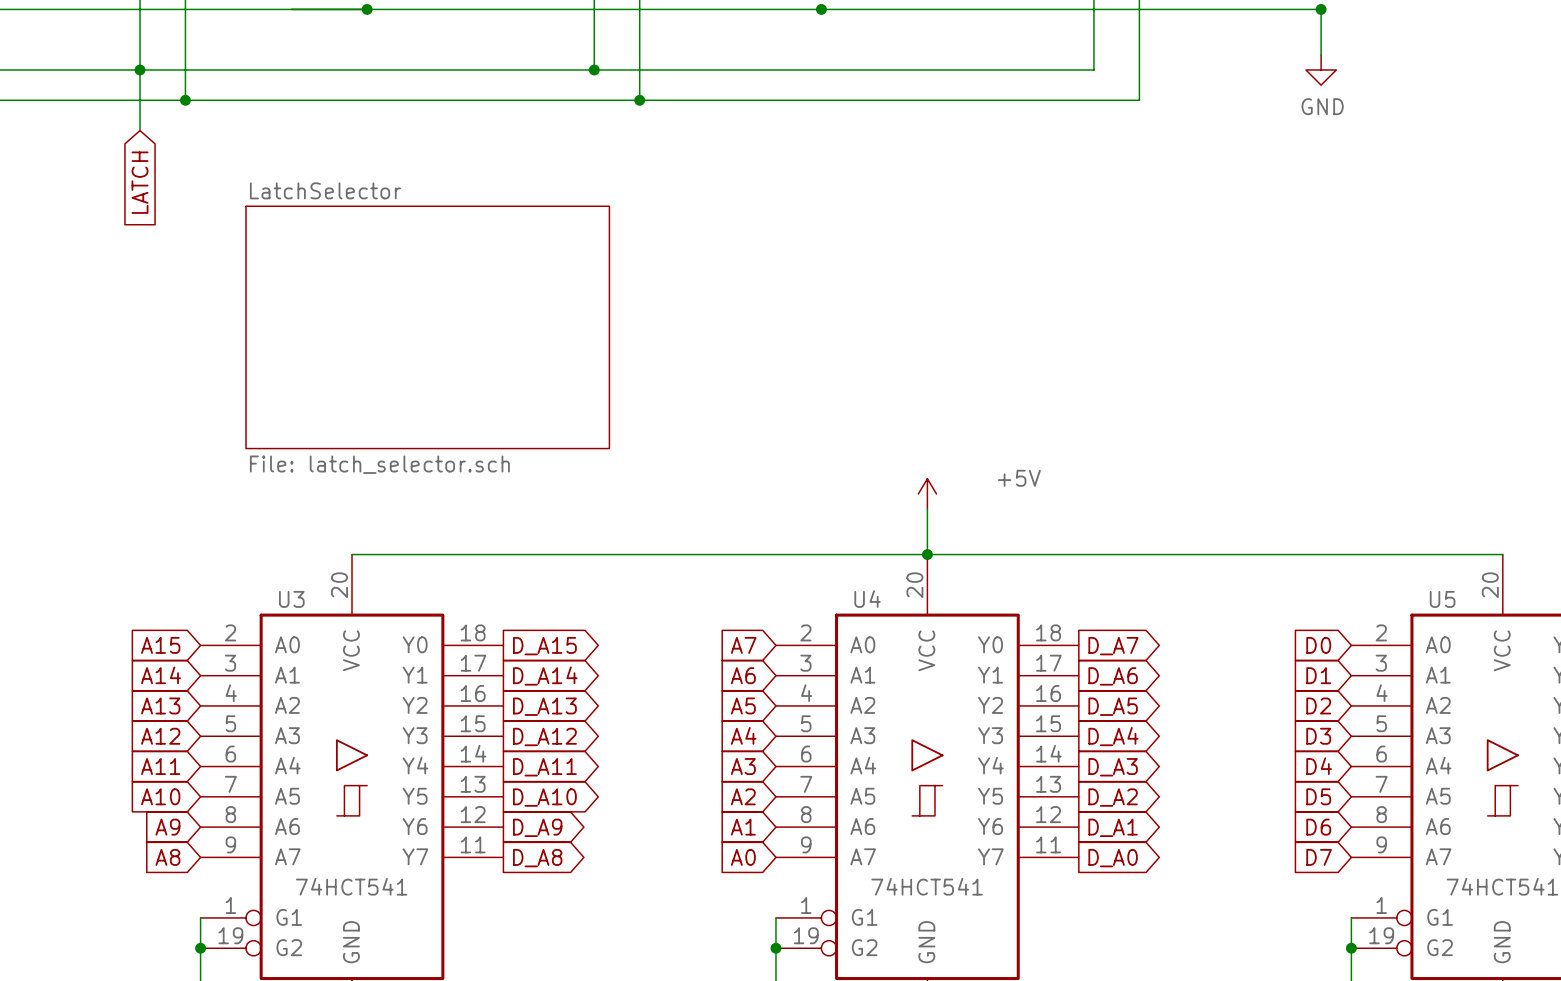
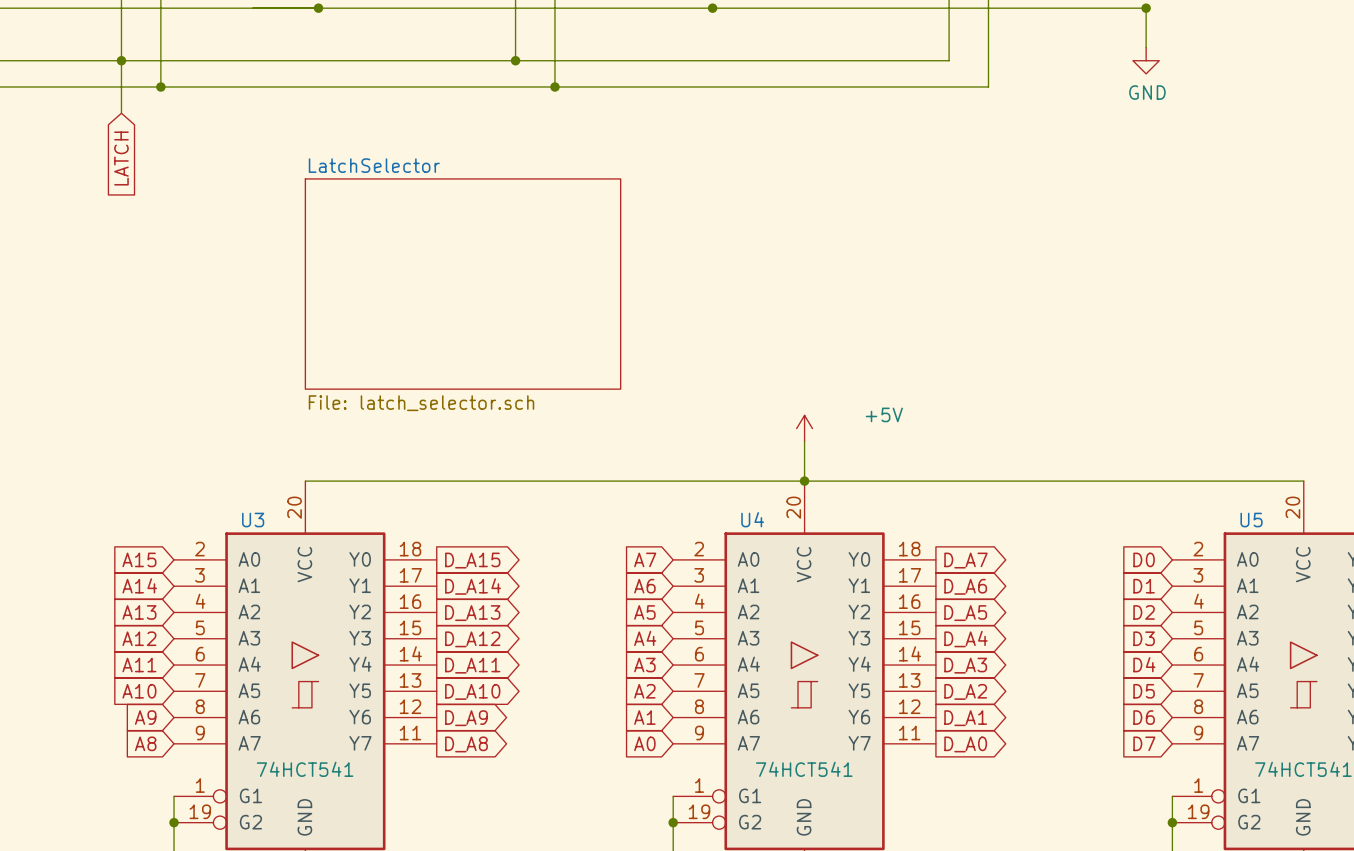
sheet LatchSelector position: (427, 327) -> (463, 284)

